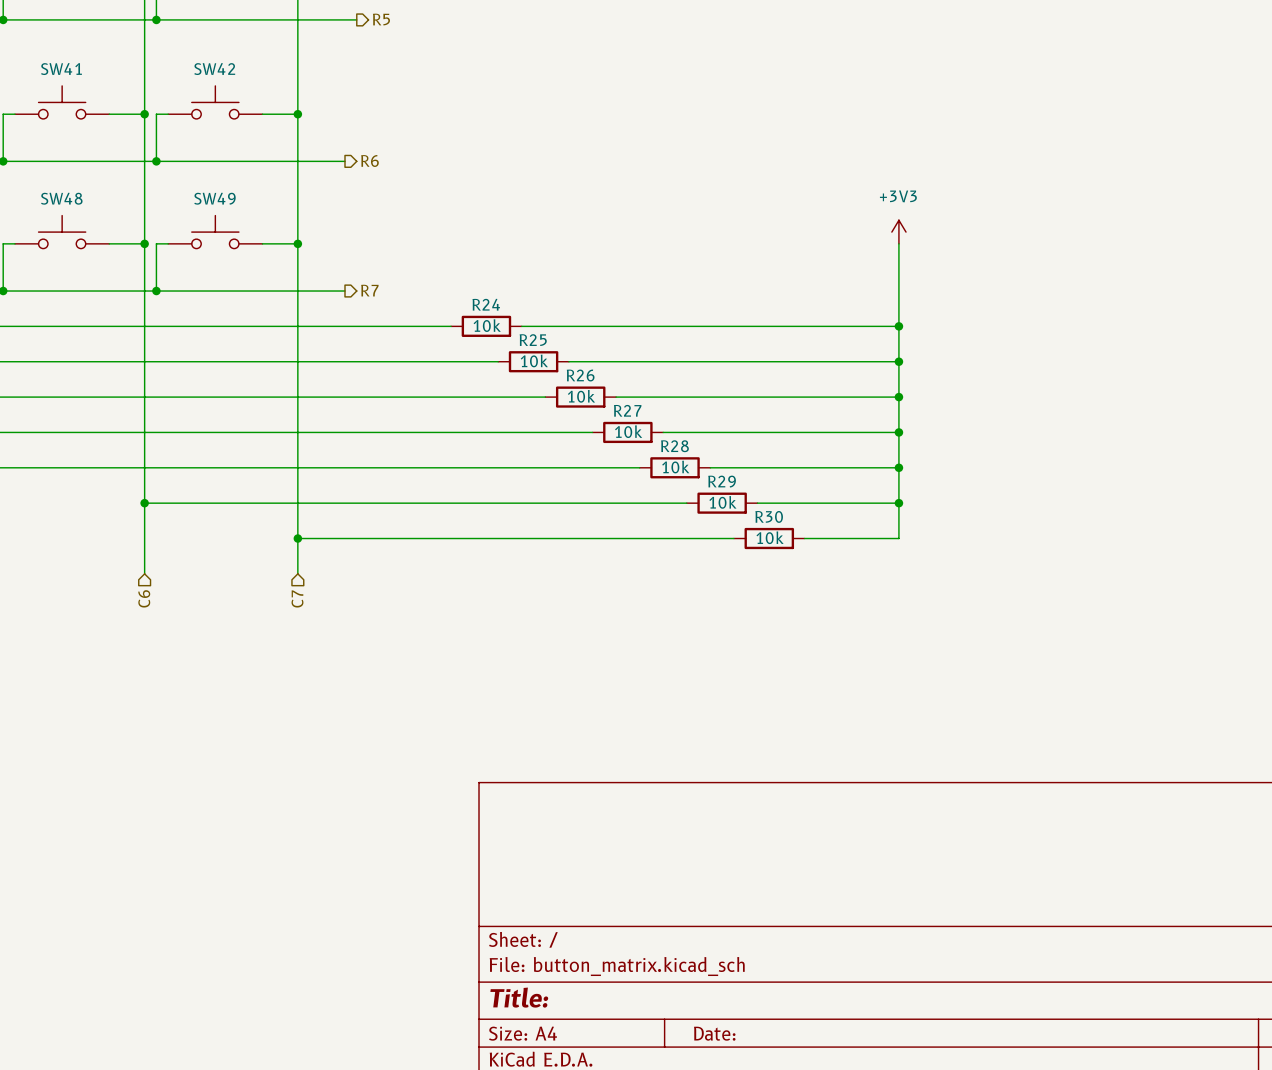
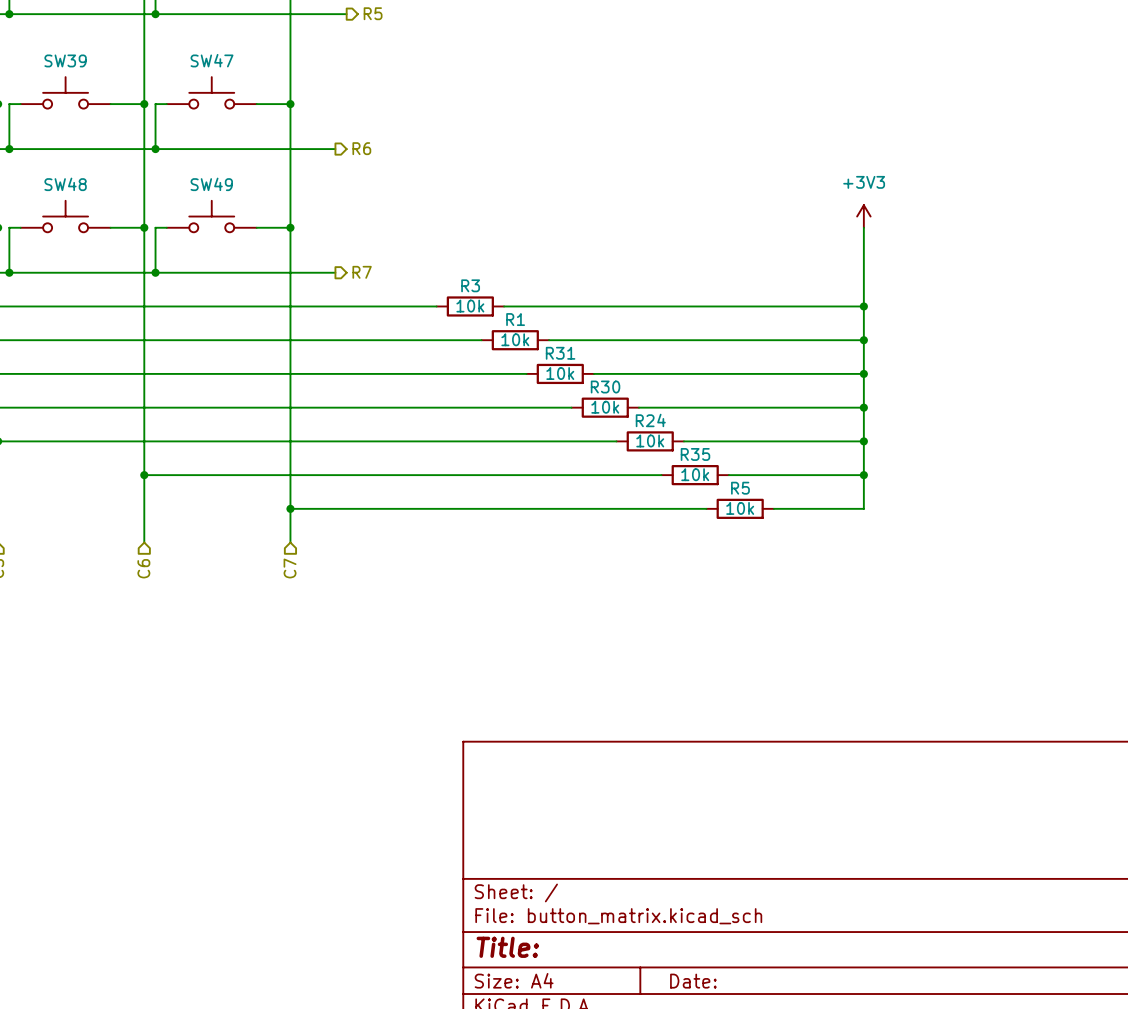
SW41 name: SW41 (61, 69) -> SW39 (65, 60)
SW42 name: SW42 (214, 69) -> SW47 (212, 60)
R24 name: R24 (486, 304) -> R3 (470, 285)
R25 name: R25 (533, 340) -> R1 (515, 319)
R26 name: R26 (580, 375) -> R31 (560, 353)
R27 name: R27 (627, 410) -> R30 (605, 387)
R28 name: R28 (674, 446) -> R24 (650, 420)
R29 name: R29 (722, 481) -> R35 (695, 454)
R30 name: R30 (769, 516) -> R5 (740, 488)

